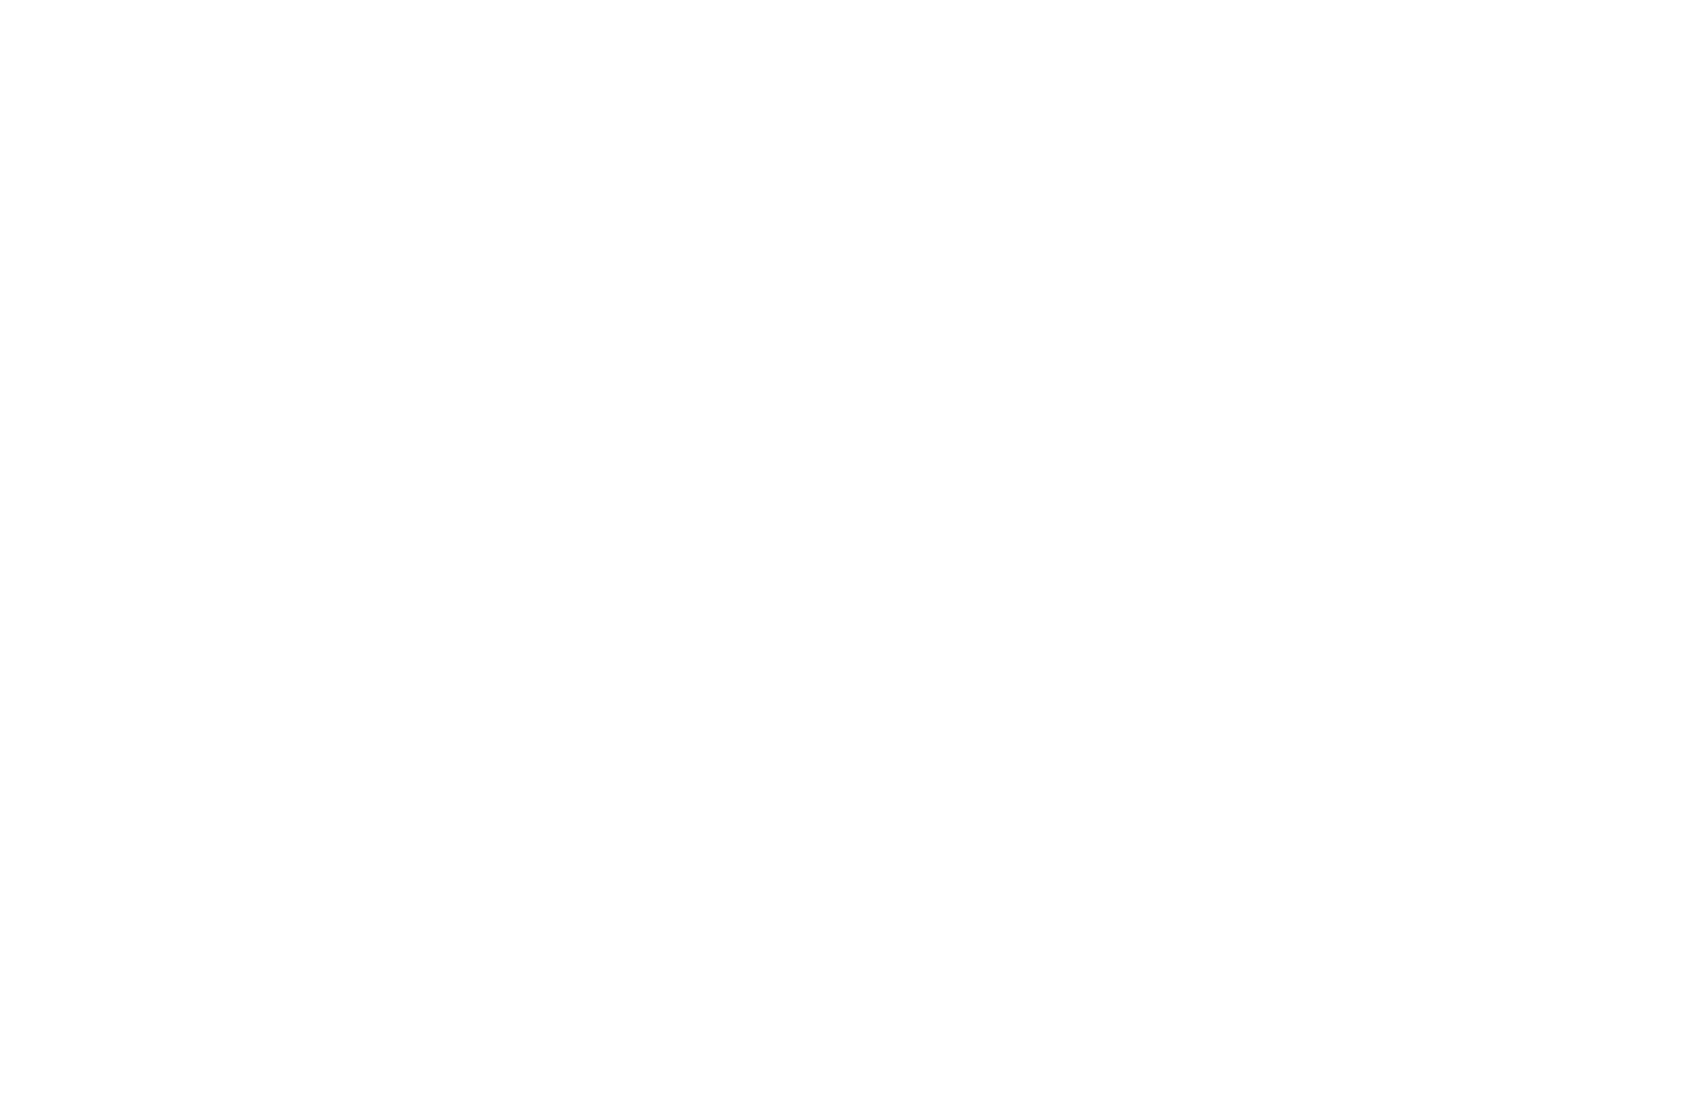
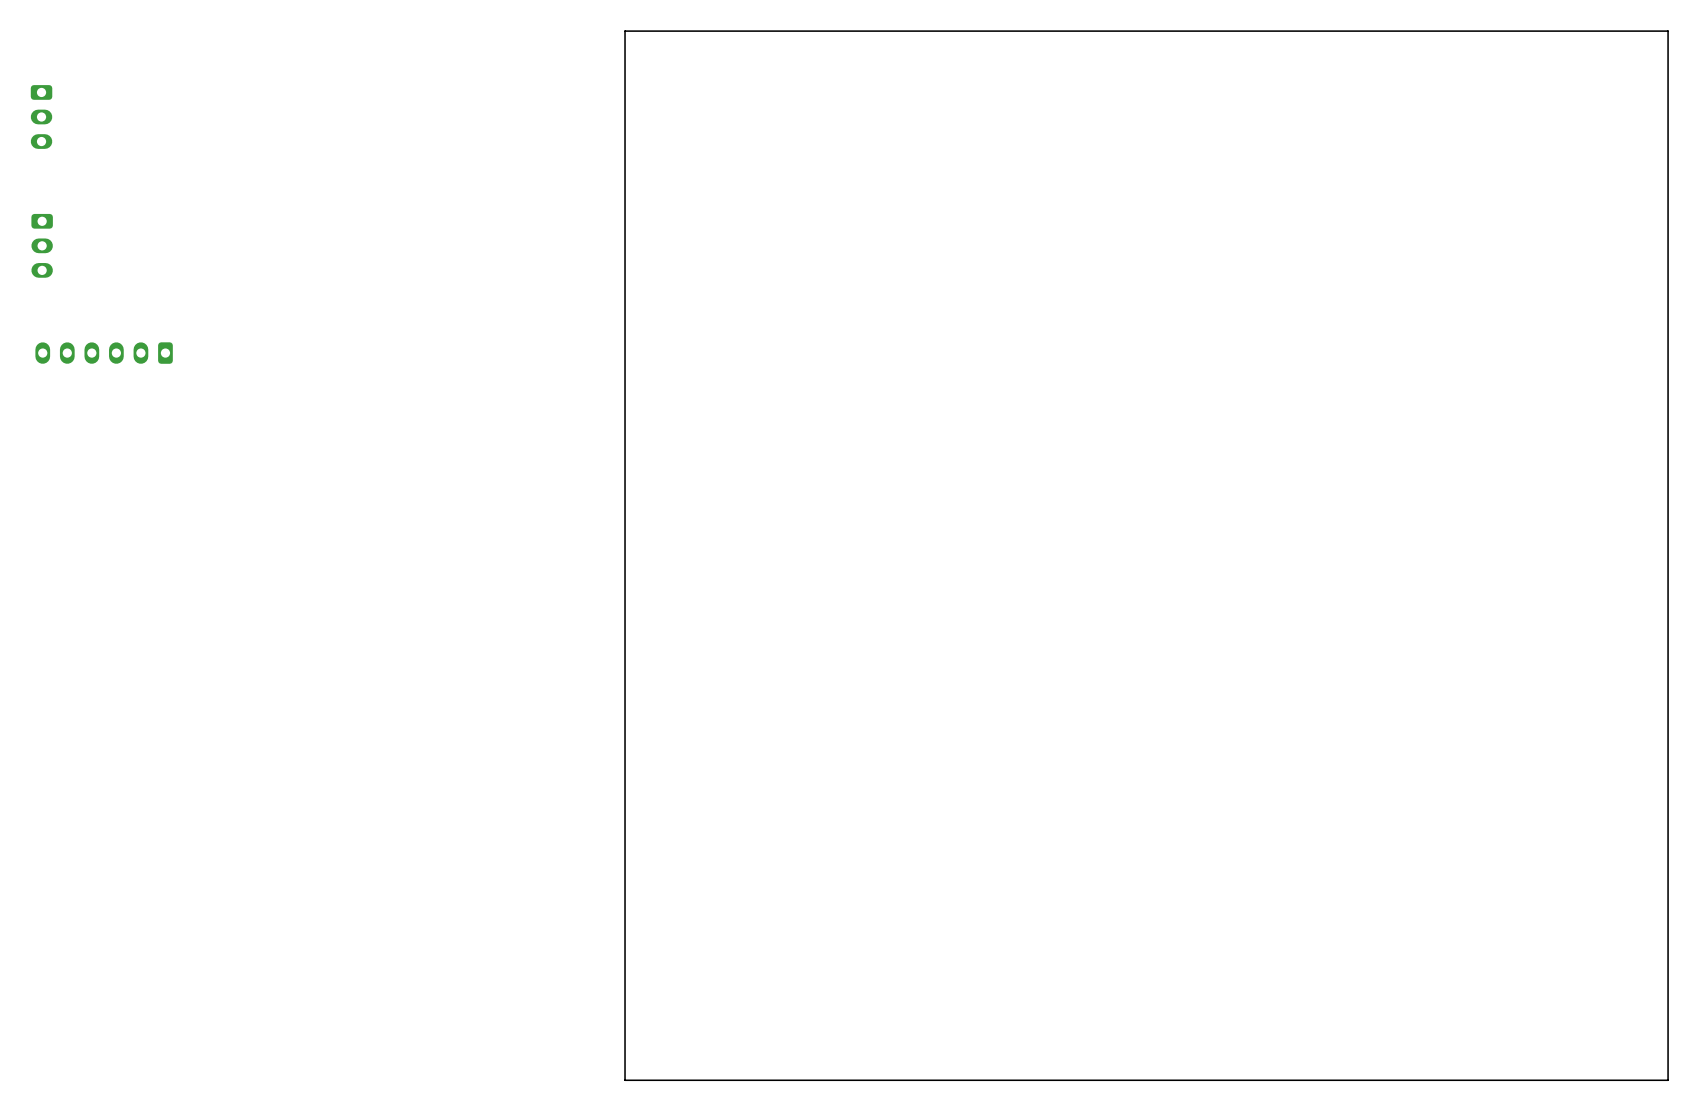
board edge: none -> (1668, 31) (625, 31) (625, 1080) (1668, 1080) (1668, 31)
part: none -> (41, 116)
part: none -> (42, 245)
part: none -> (104, 353)

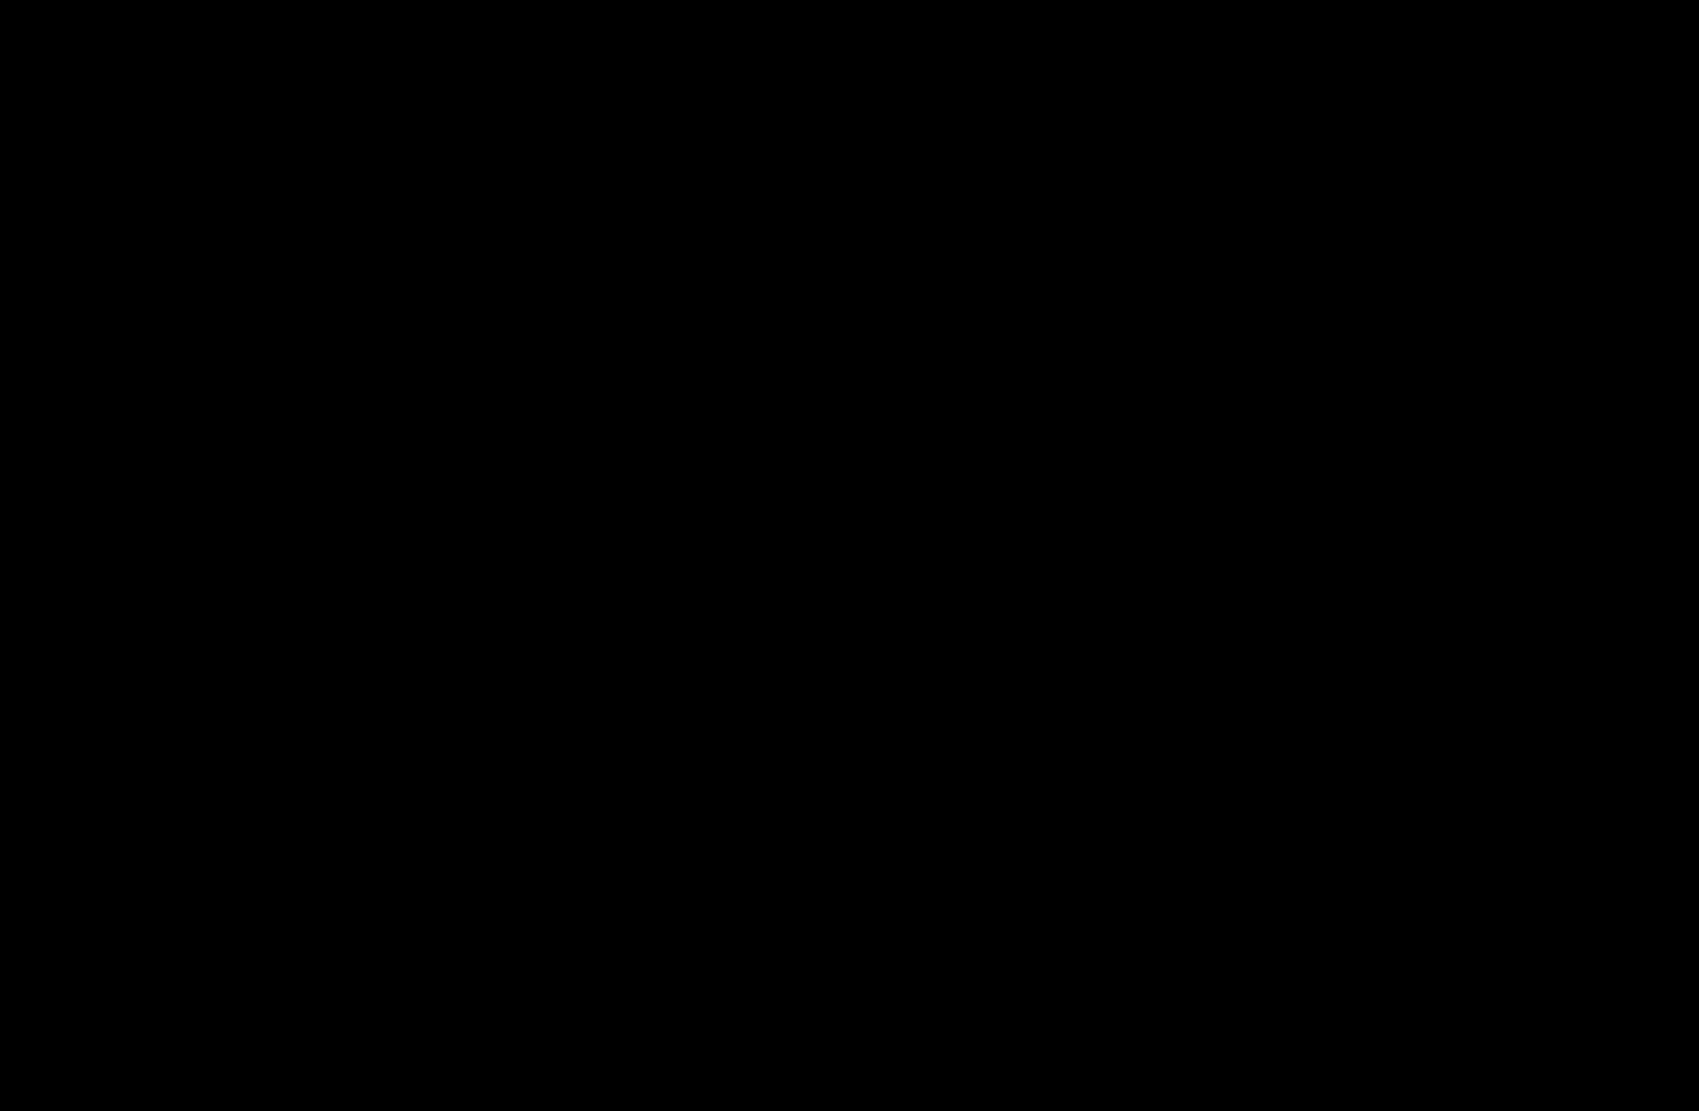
board edge: (1668, 31) (625, 31) (625, 1080) (1668, 1080) (1668, 31) -> none
part: (41, 116) -> none
part: (42, 245) -> none
part: (104, 353) -> none

